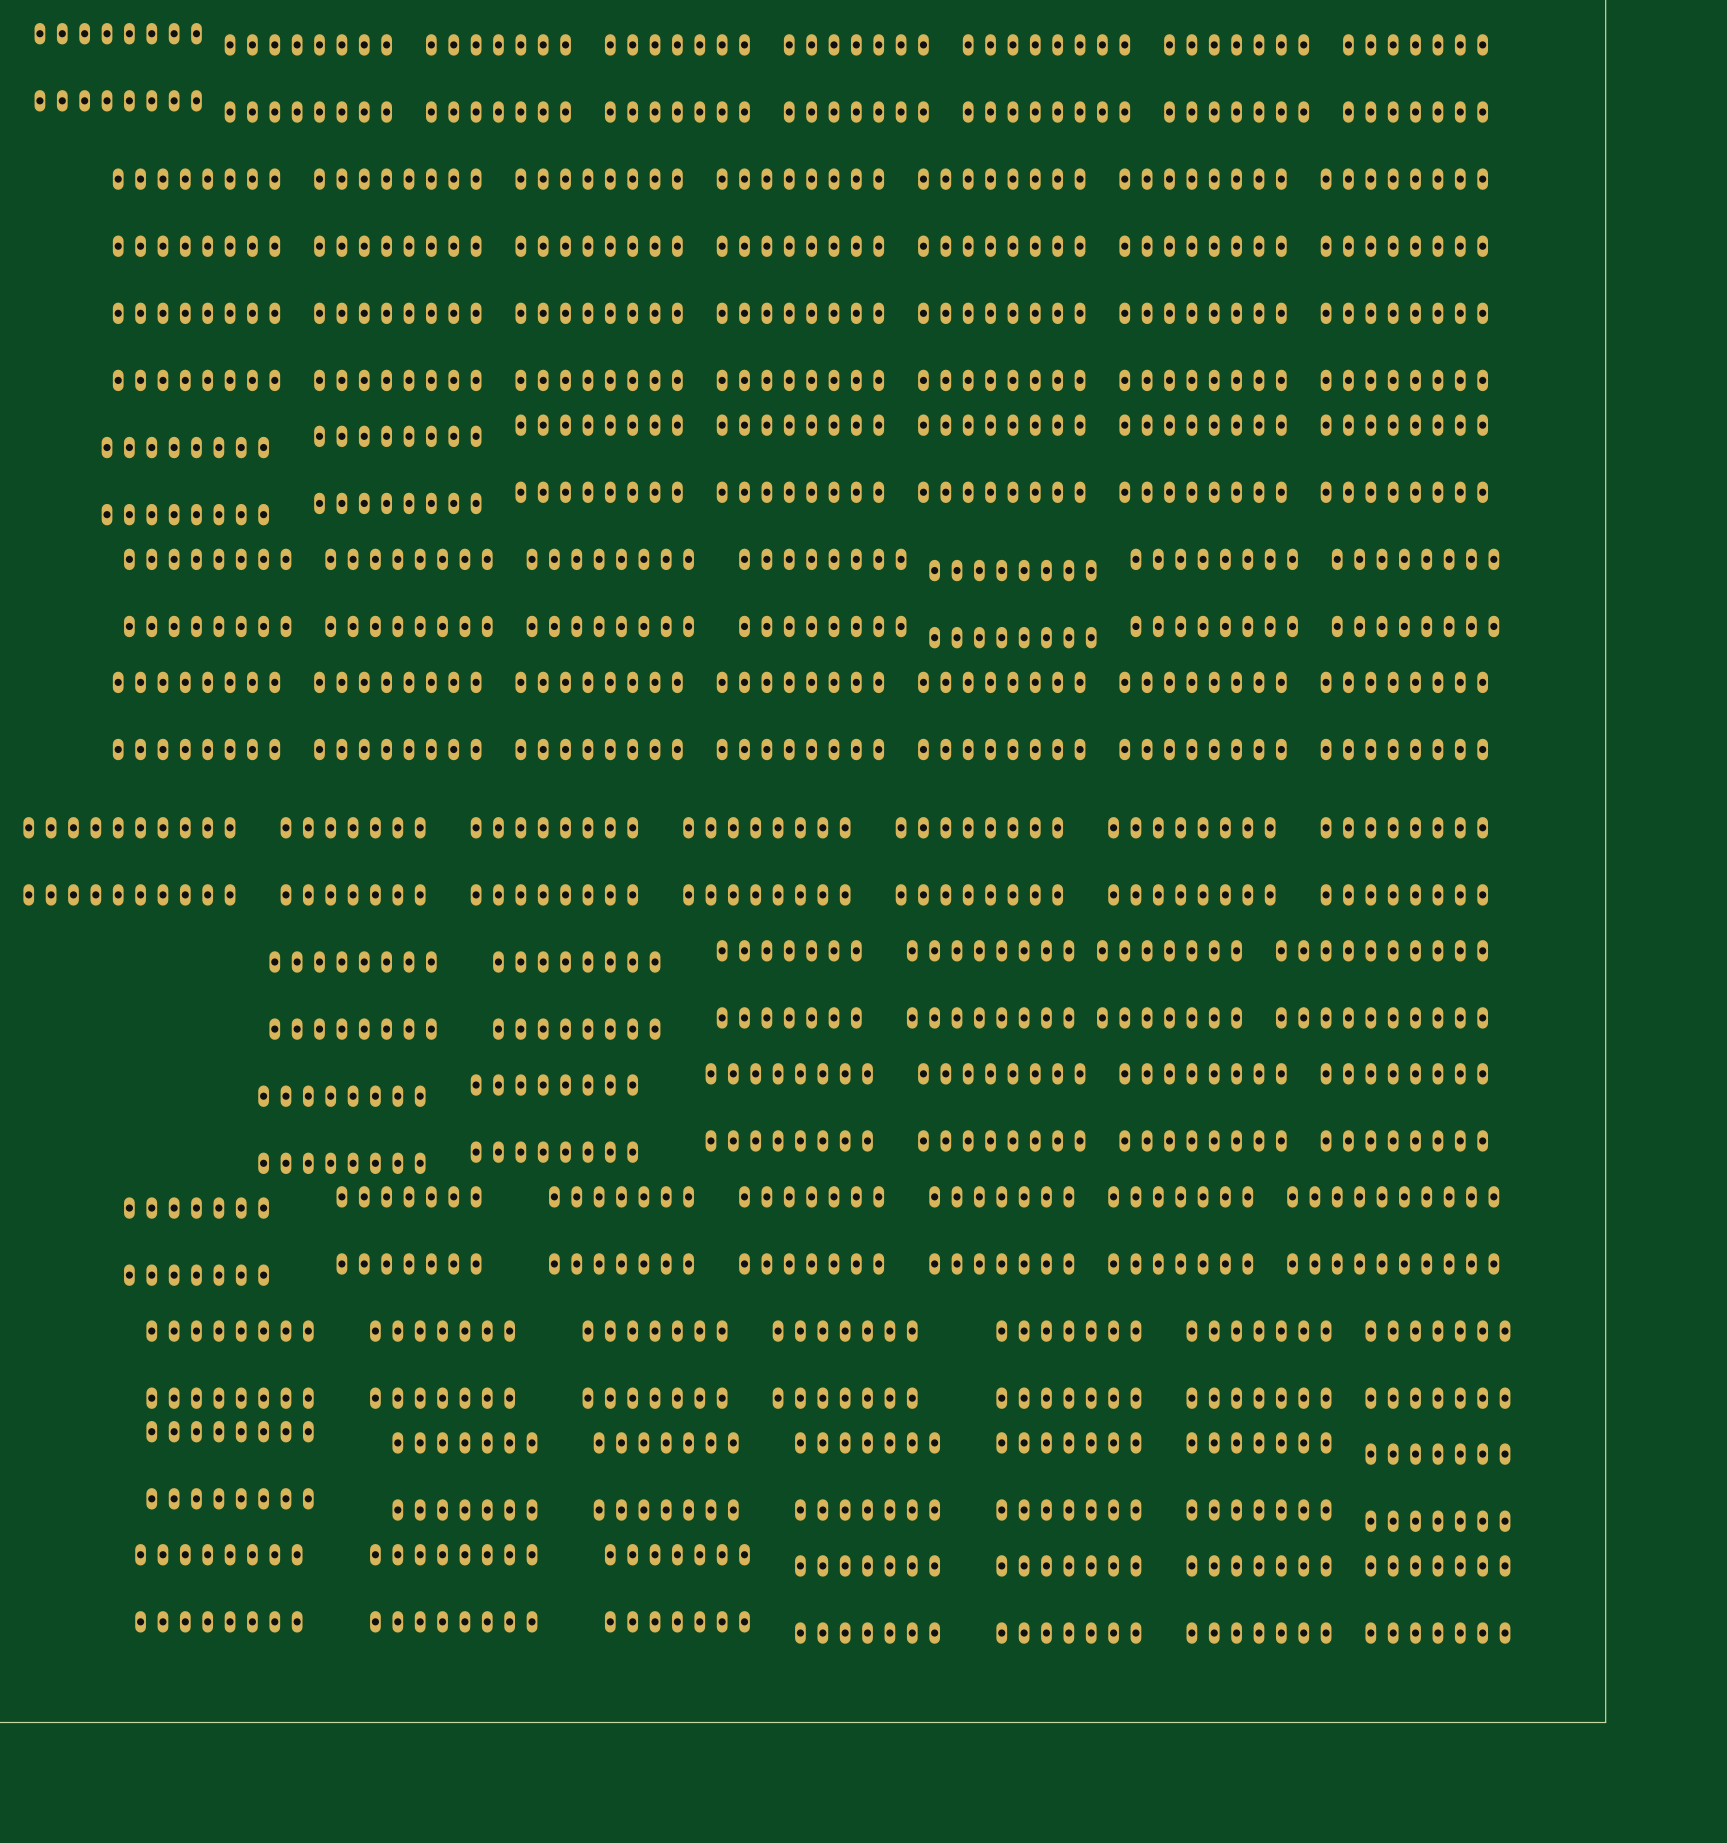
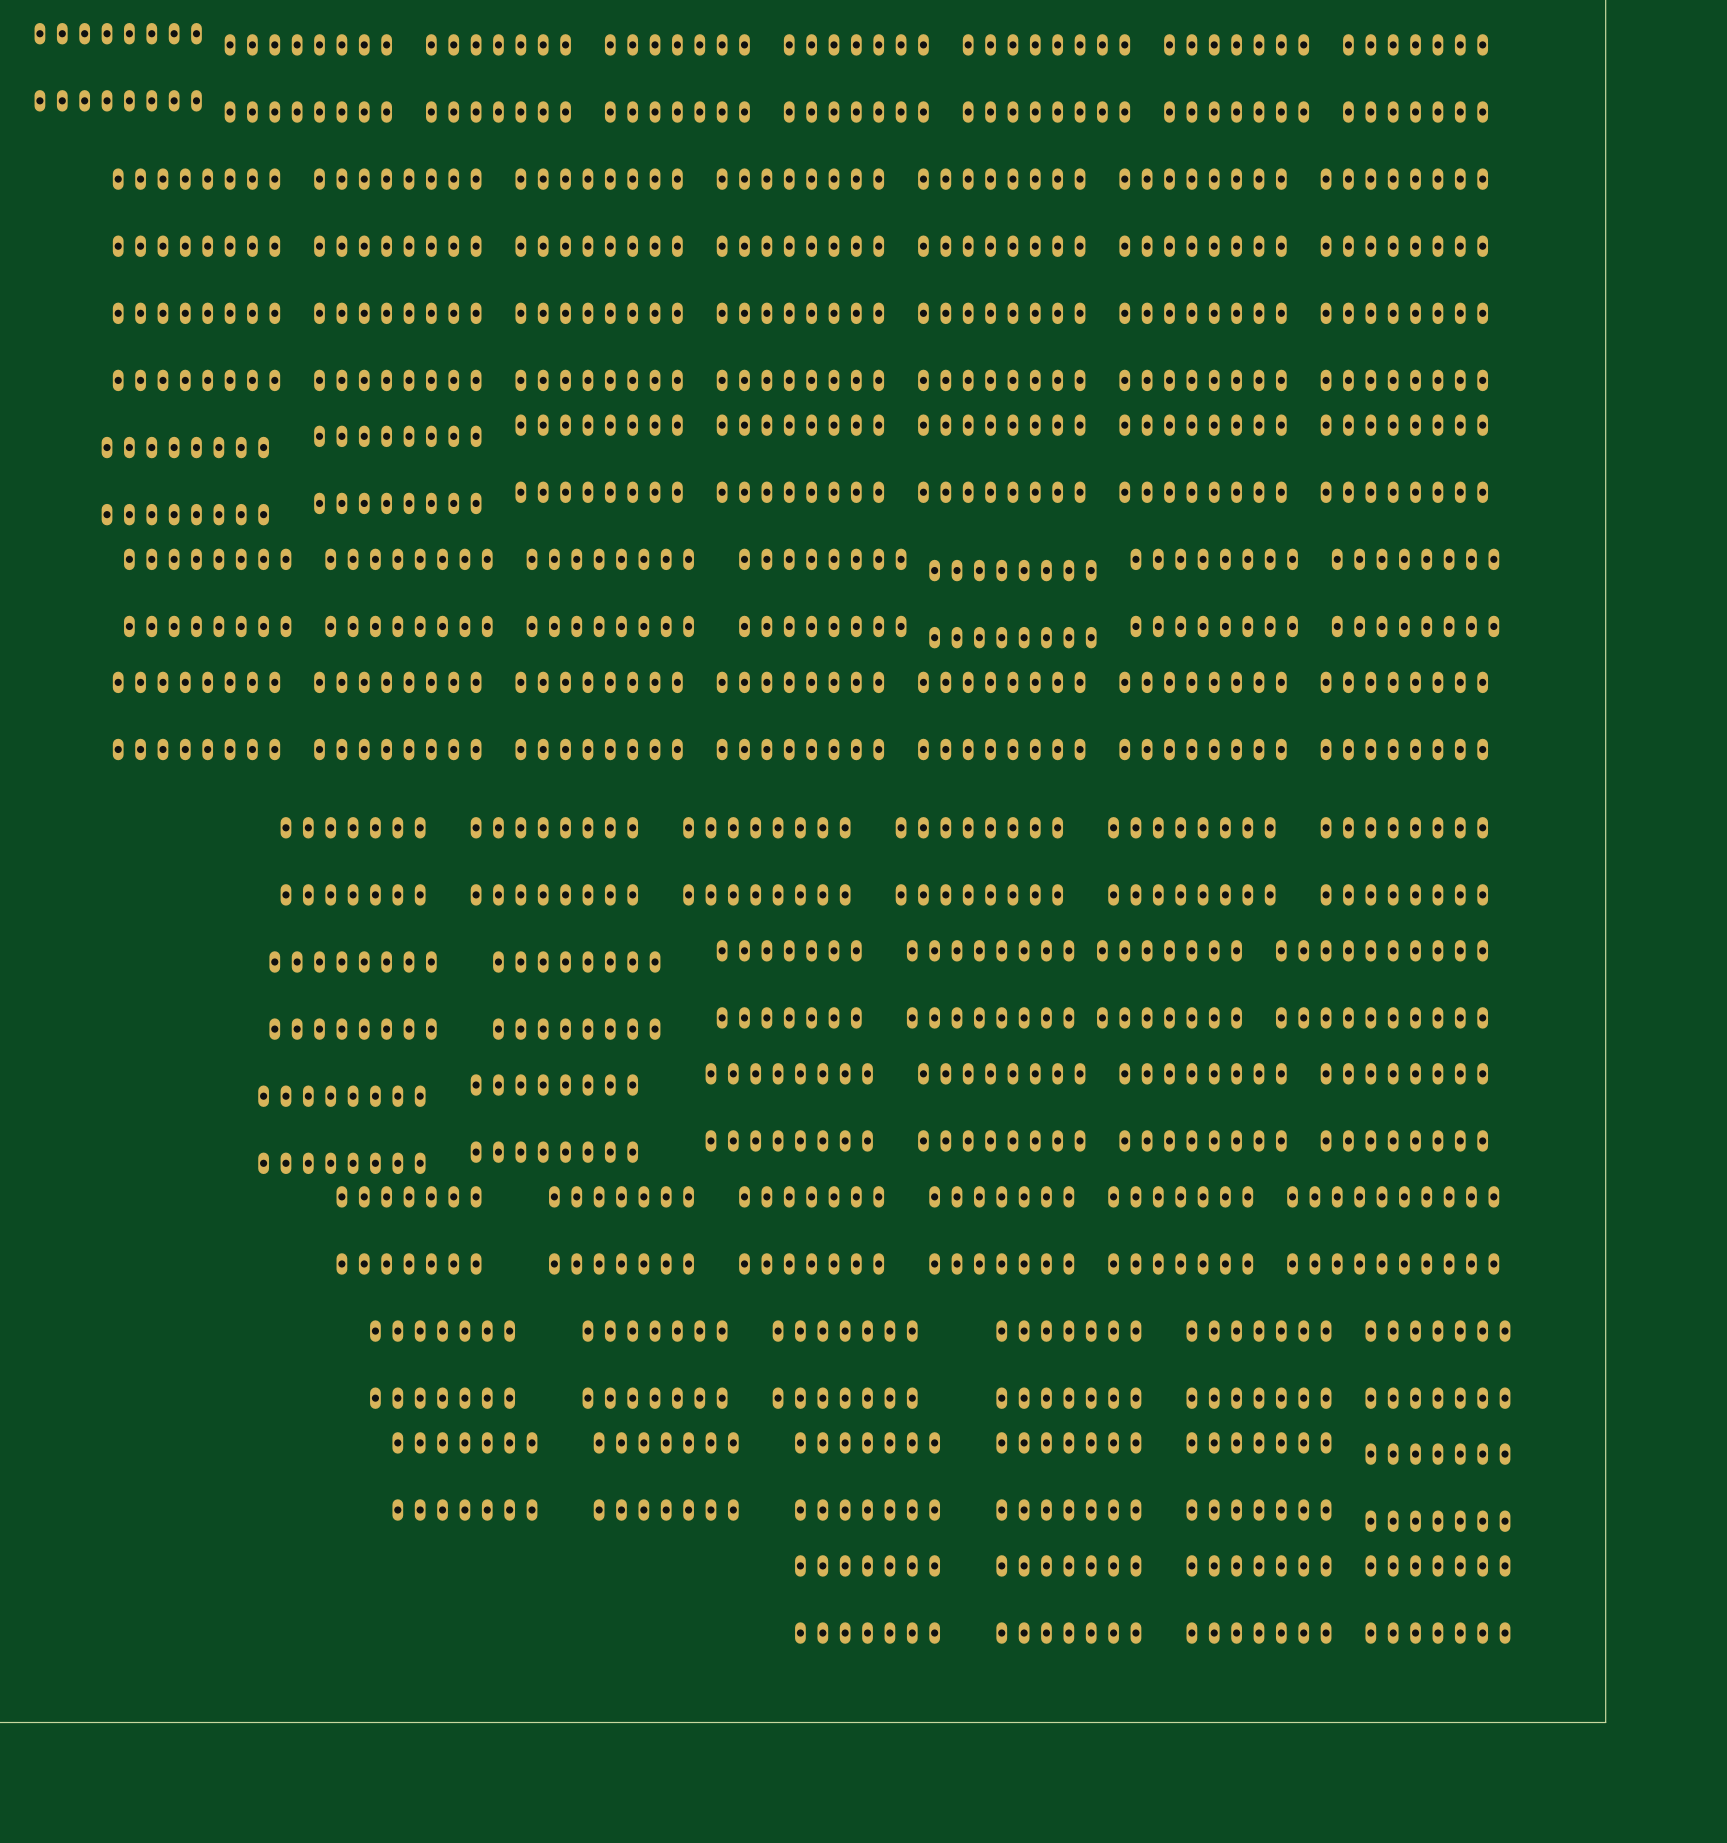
part: (129, 861) -> none
part: (196, 1241) -> none
part: (230, 1364) -> none
part: (230, 1465) -> none
part: (218, 1588) -> none
part: (453, 1588) -> none
part: (677, 1588) -> none

